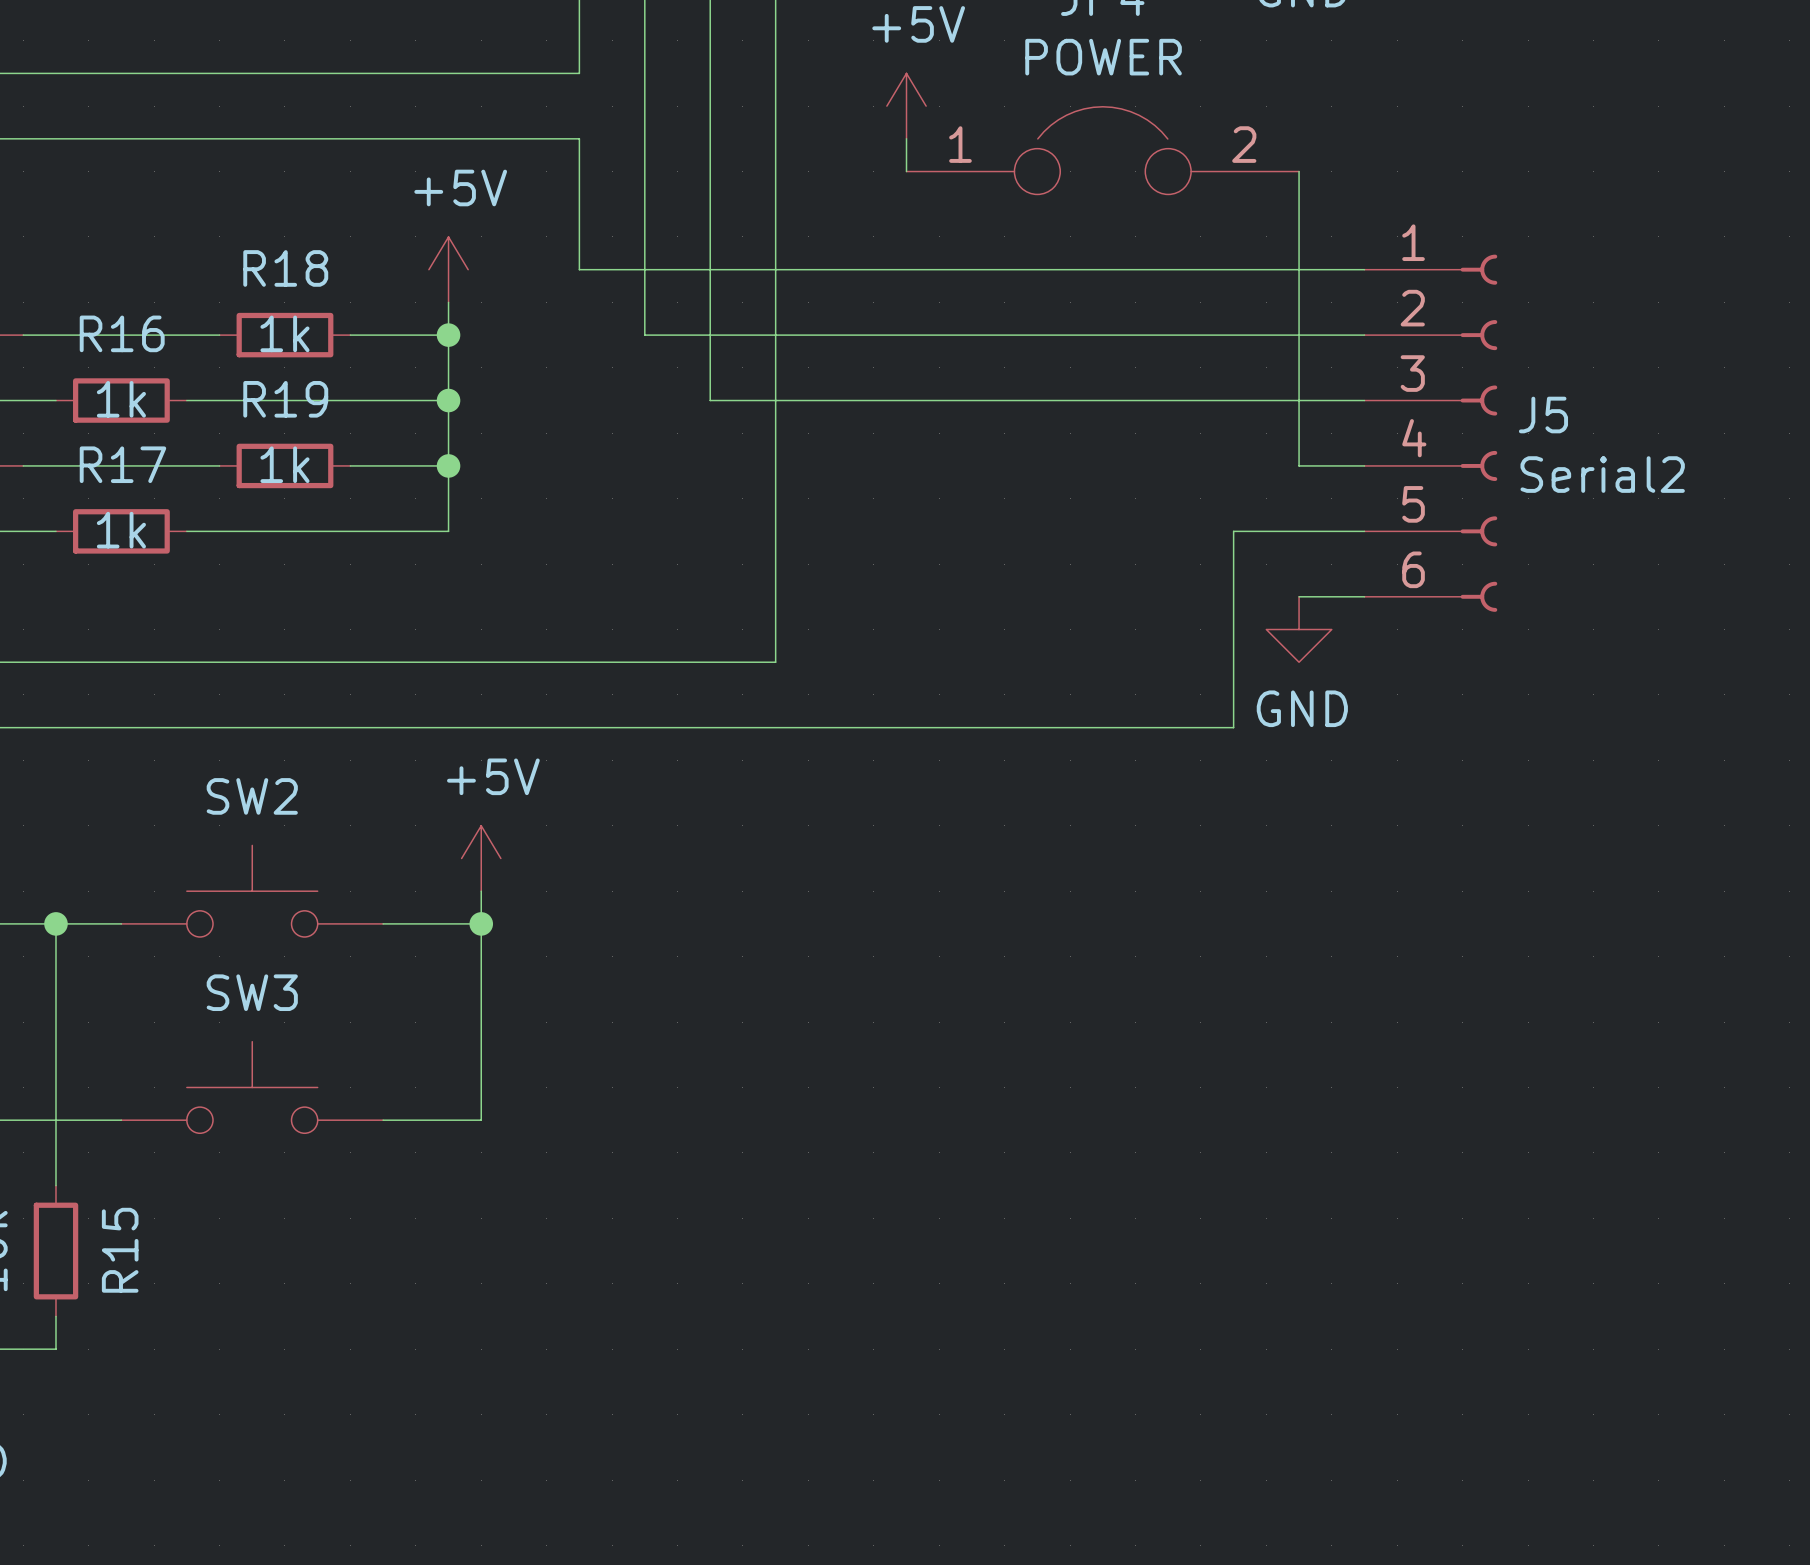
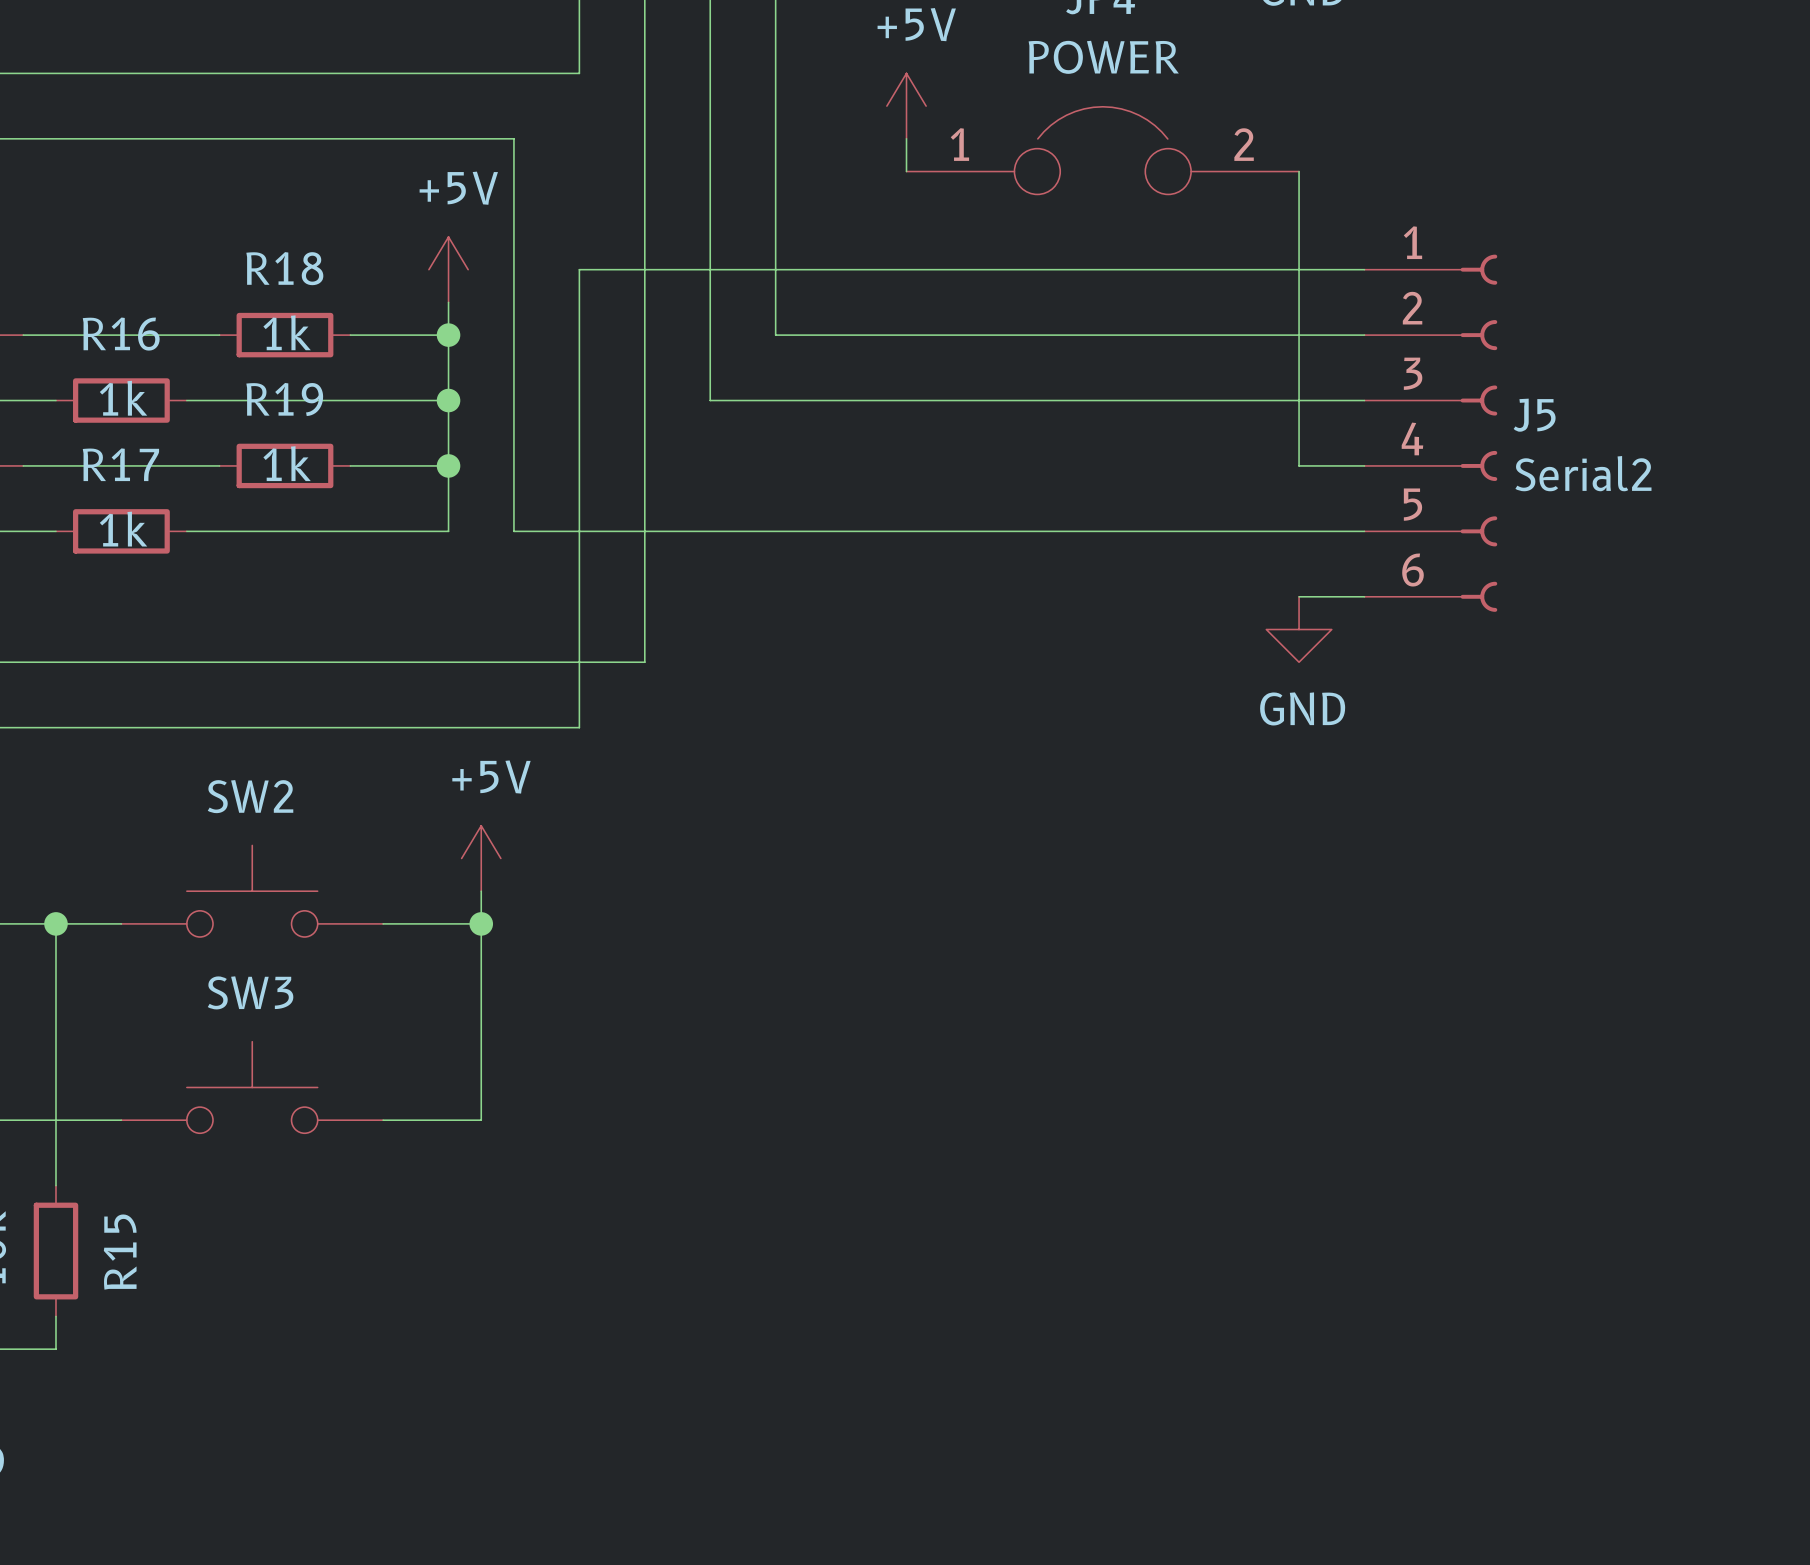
wire: (513, 138) (579, 138) (579, 269) -> (579, 727) (579, 269)
wire: (644, 335) (775, 335) (775, 662) (644, 662) -> (644, 335) (644, 662)
wire: (1233, 531) (1233, 727) (579, 727) -> (1233, 531) (513, 531) (513, 138)

